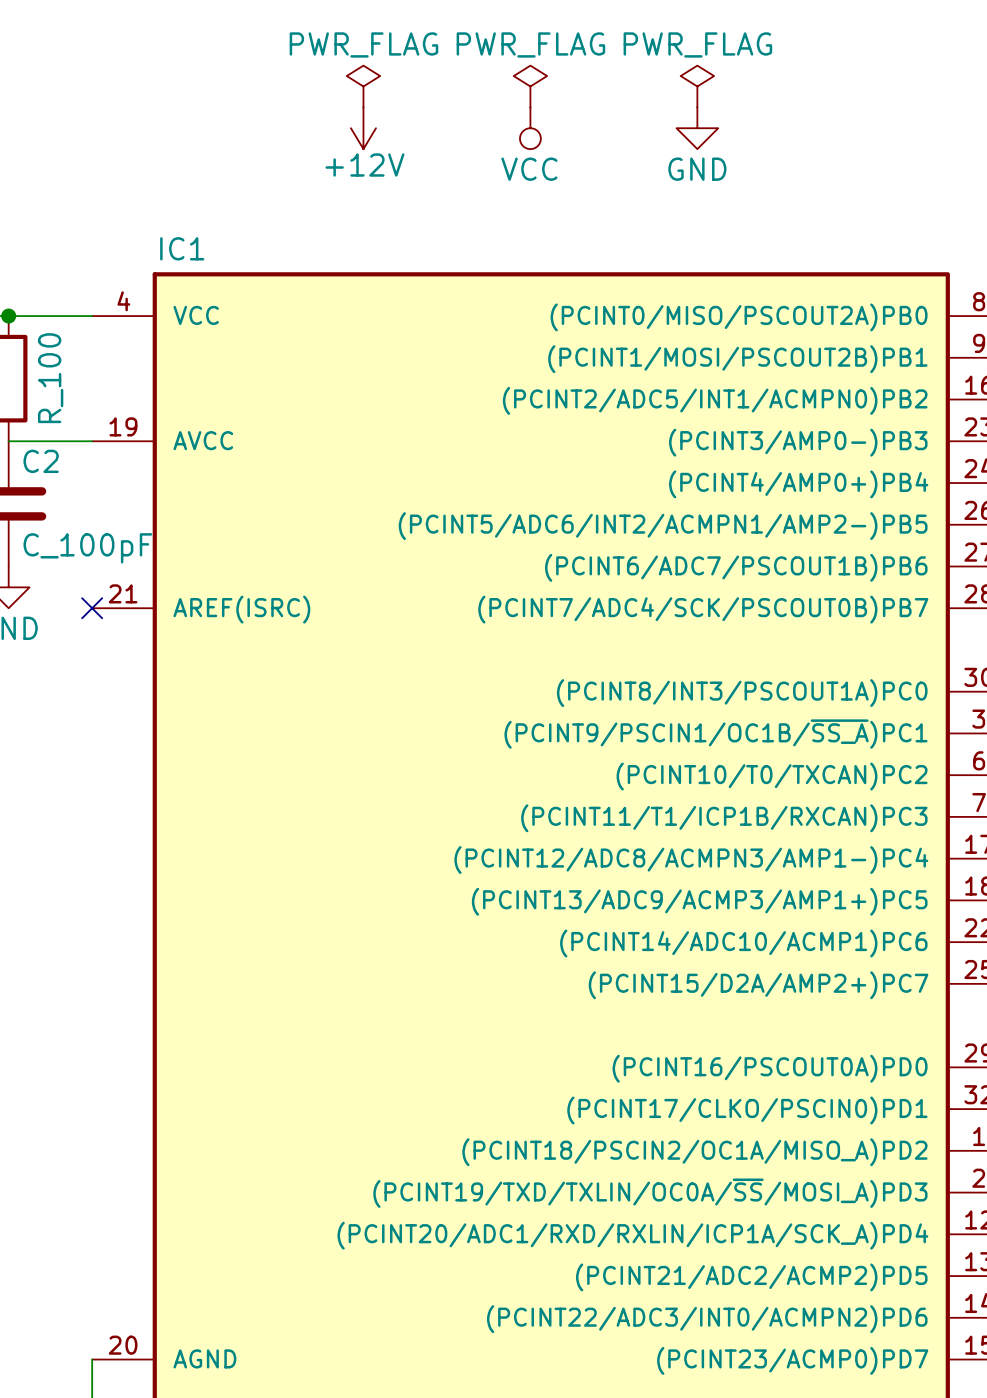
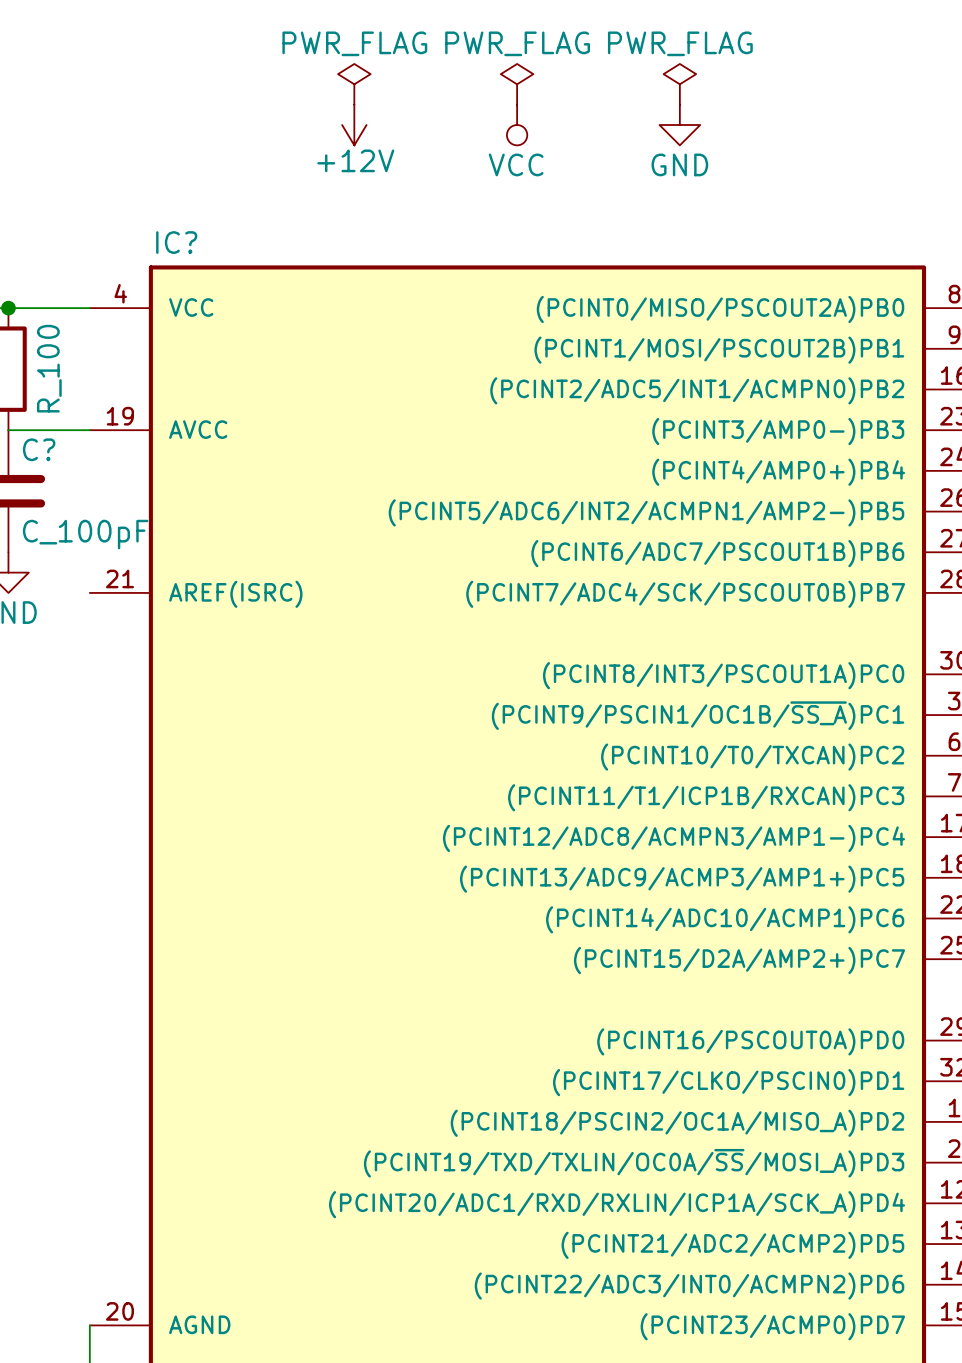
IC1 name: IC1 (182, 248) -> IC? (176, 242)
C2 name: C2 (41, 461) -> C? (39, 449)
no-connect mark: (92, 608) -> none

